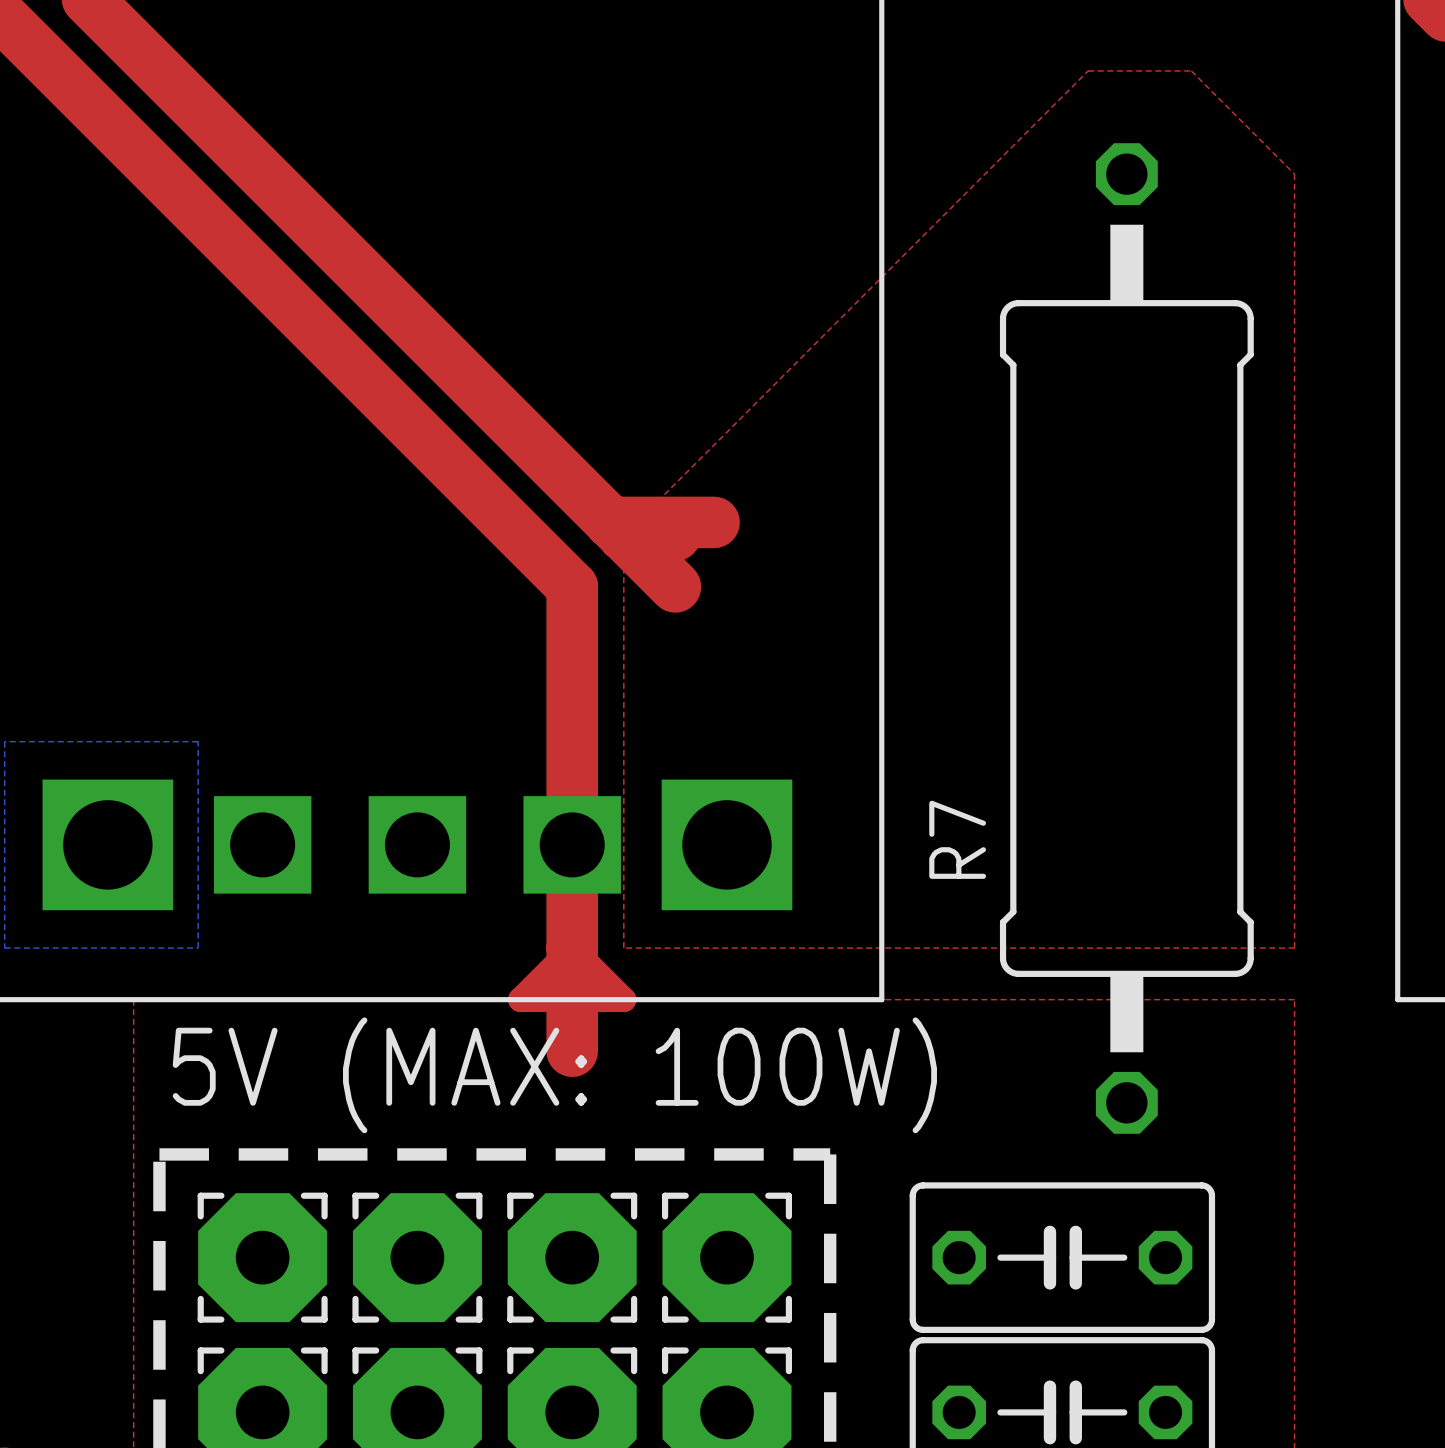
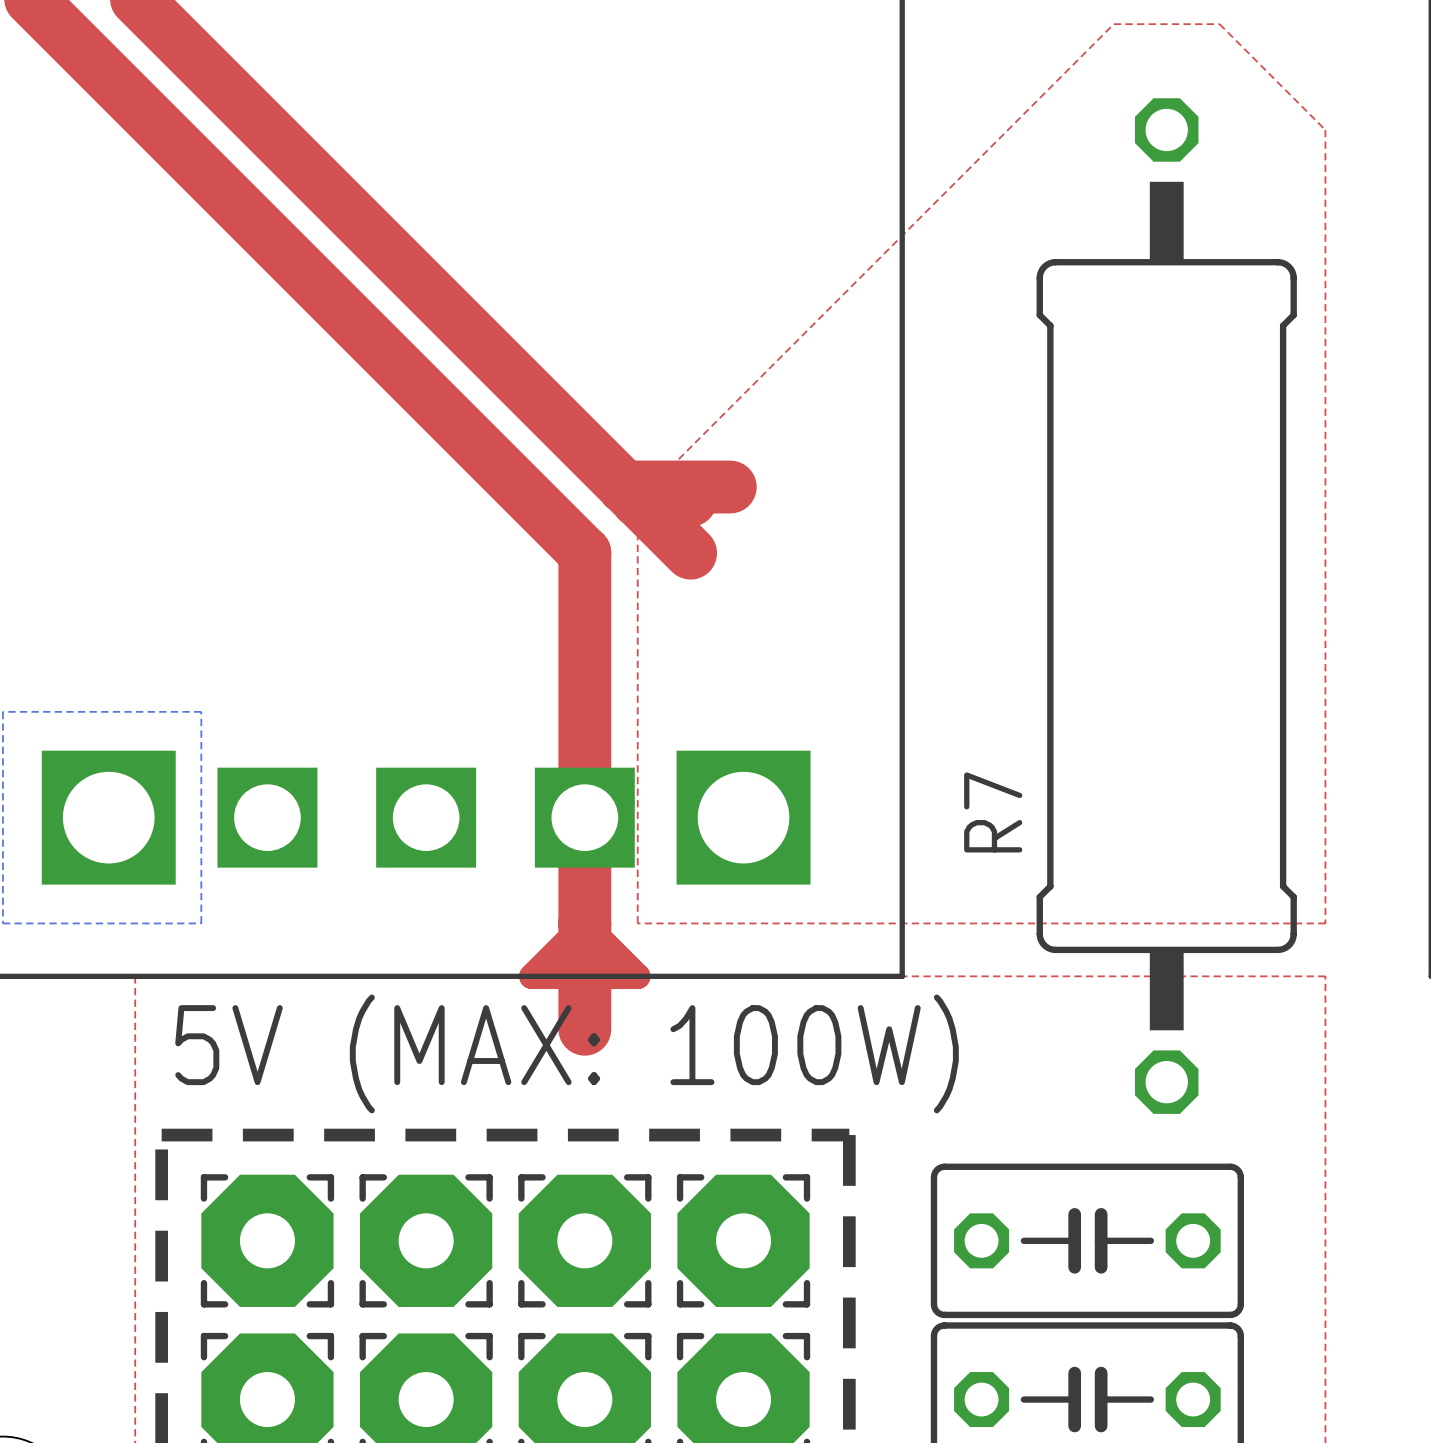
R7 position: (1126, 638) -> (1166, 606)

